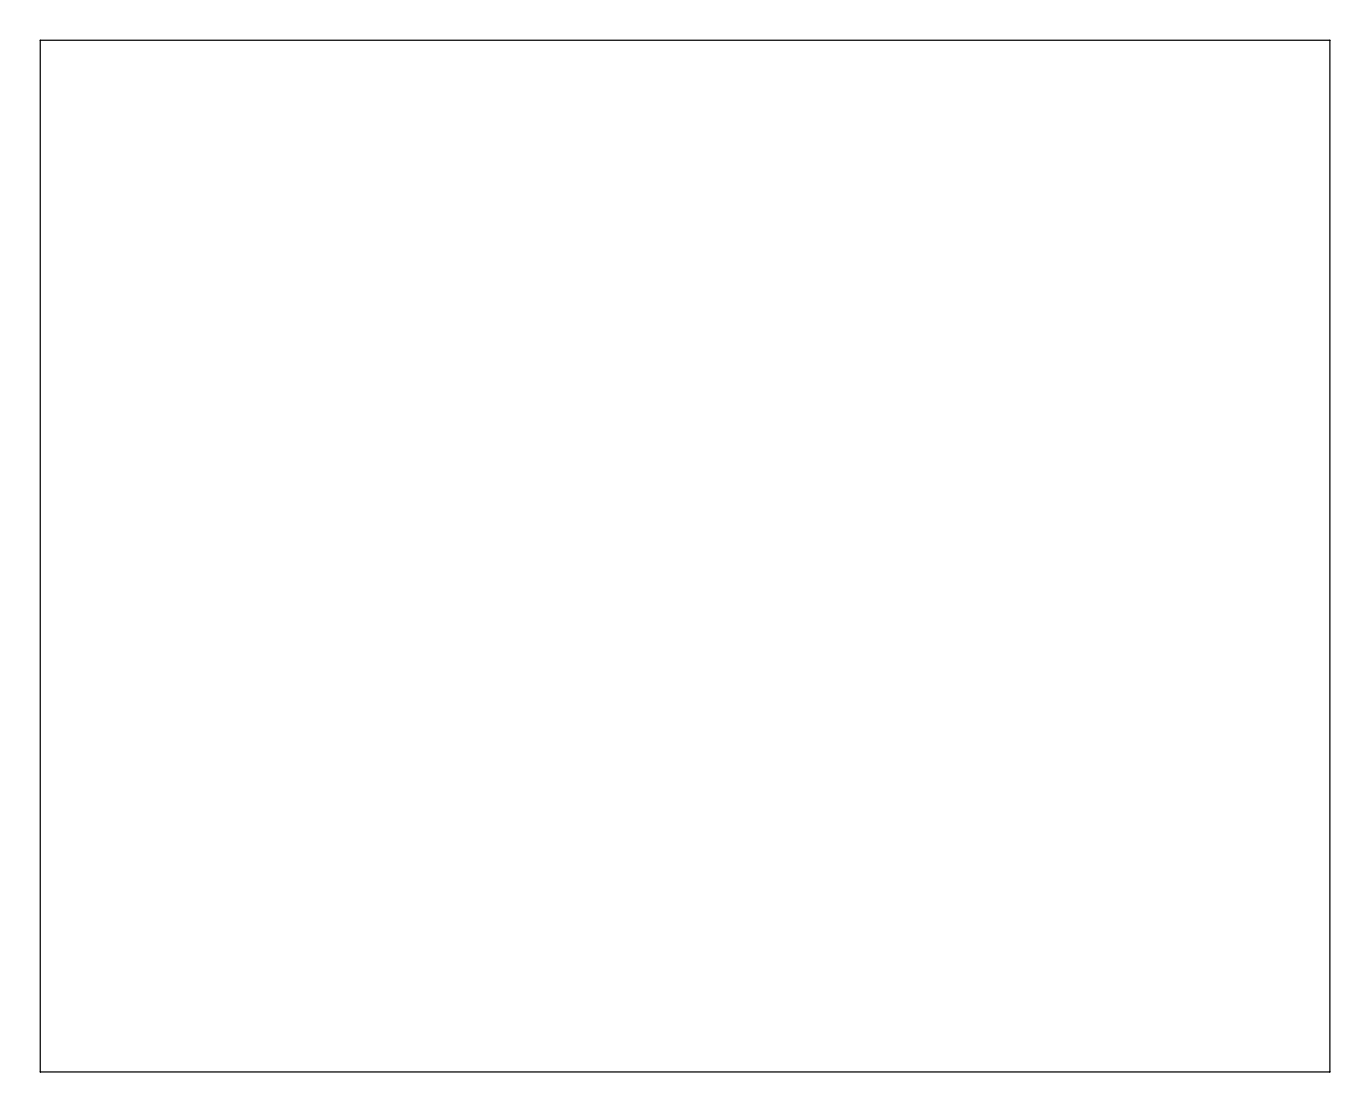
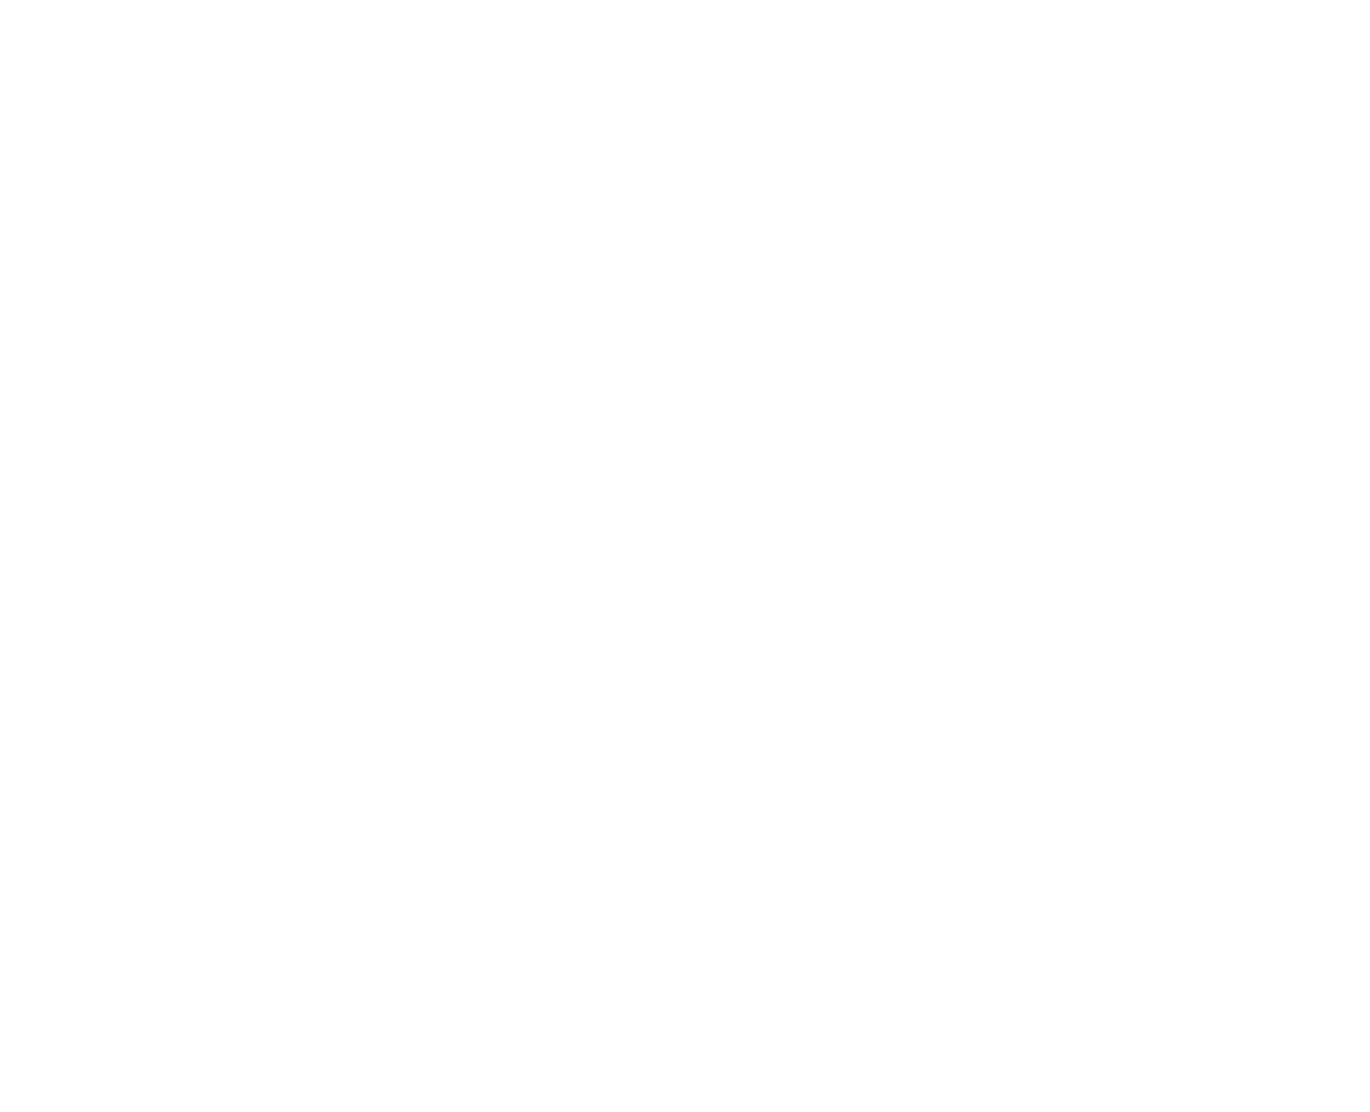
board edge: (1329, 40) (40, 40) (40, 1071) (1329, 1071) (1329, 40) -> none

